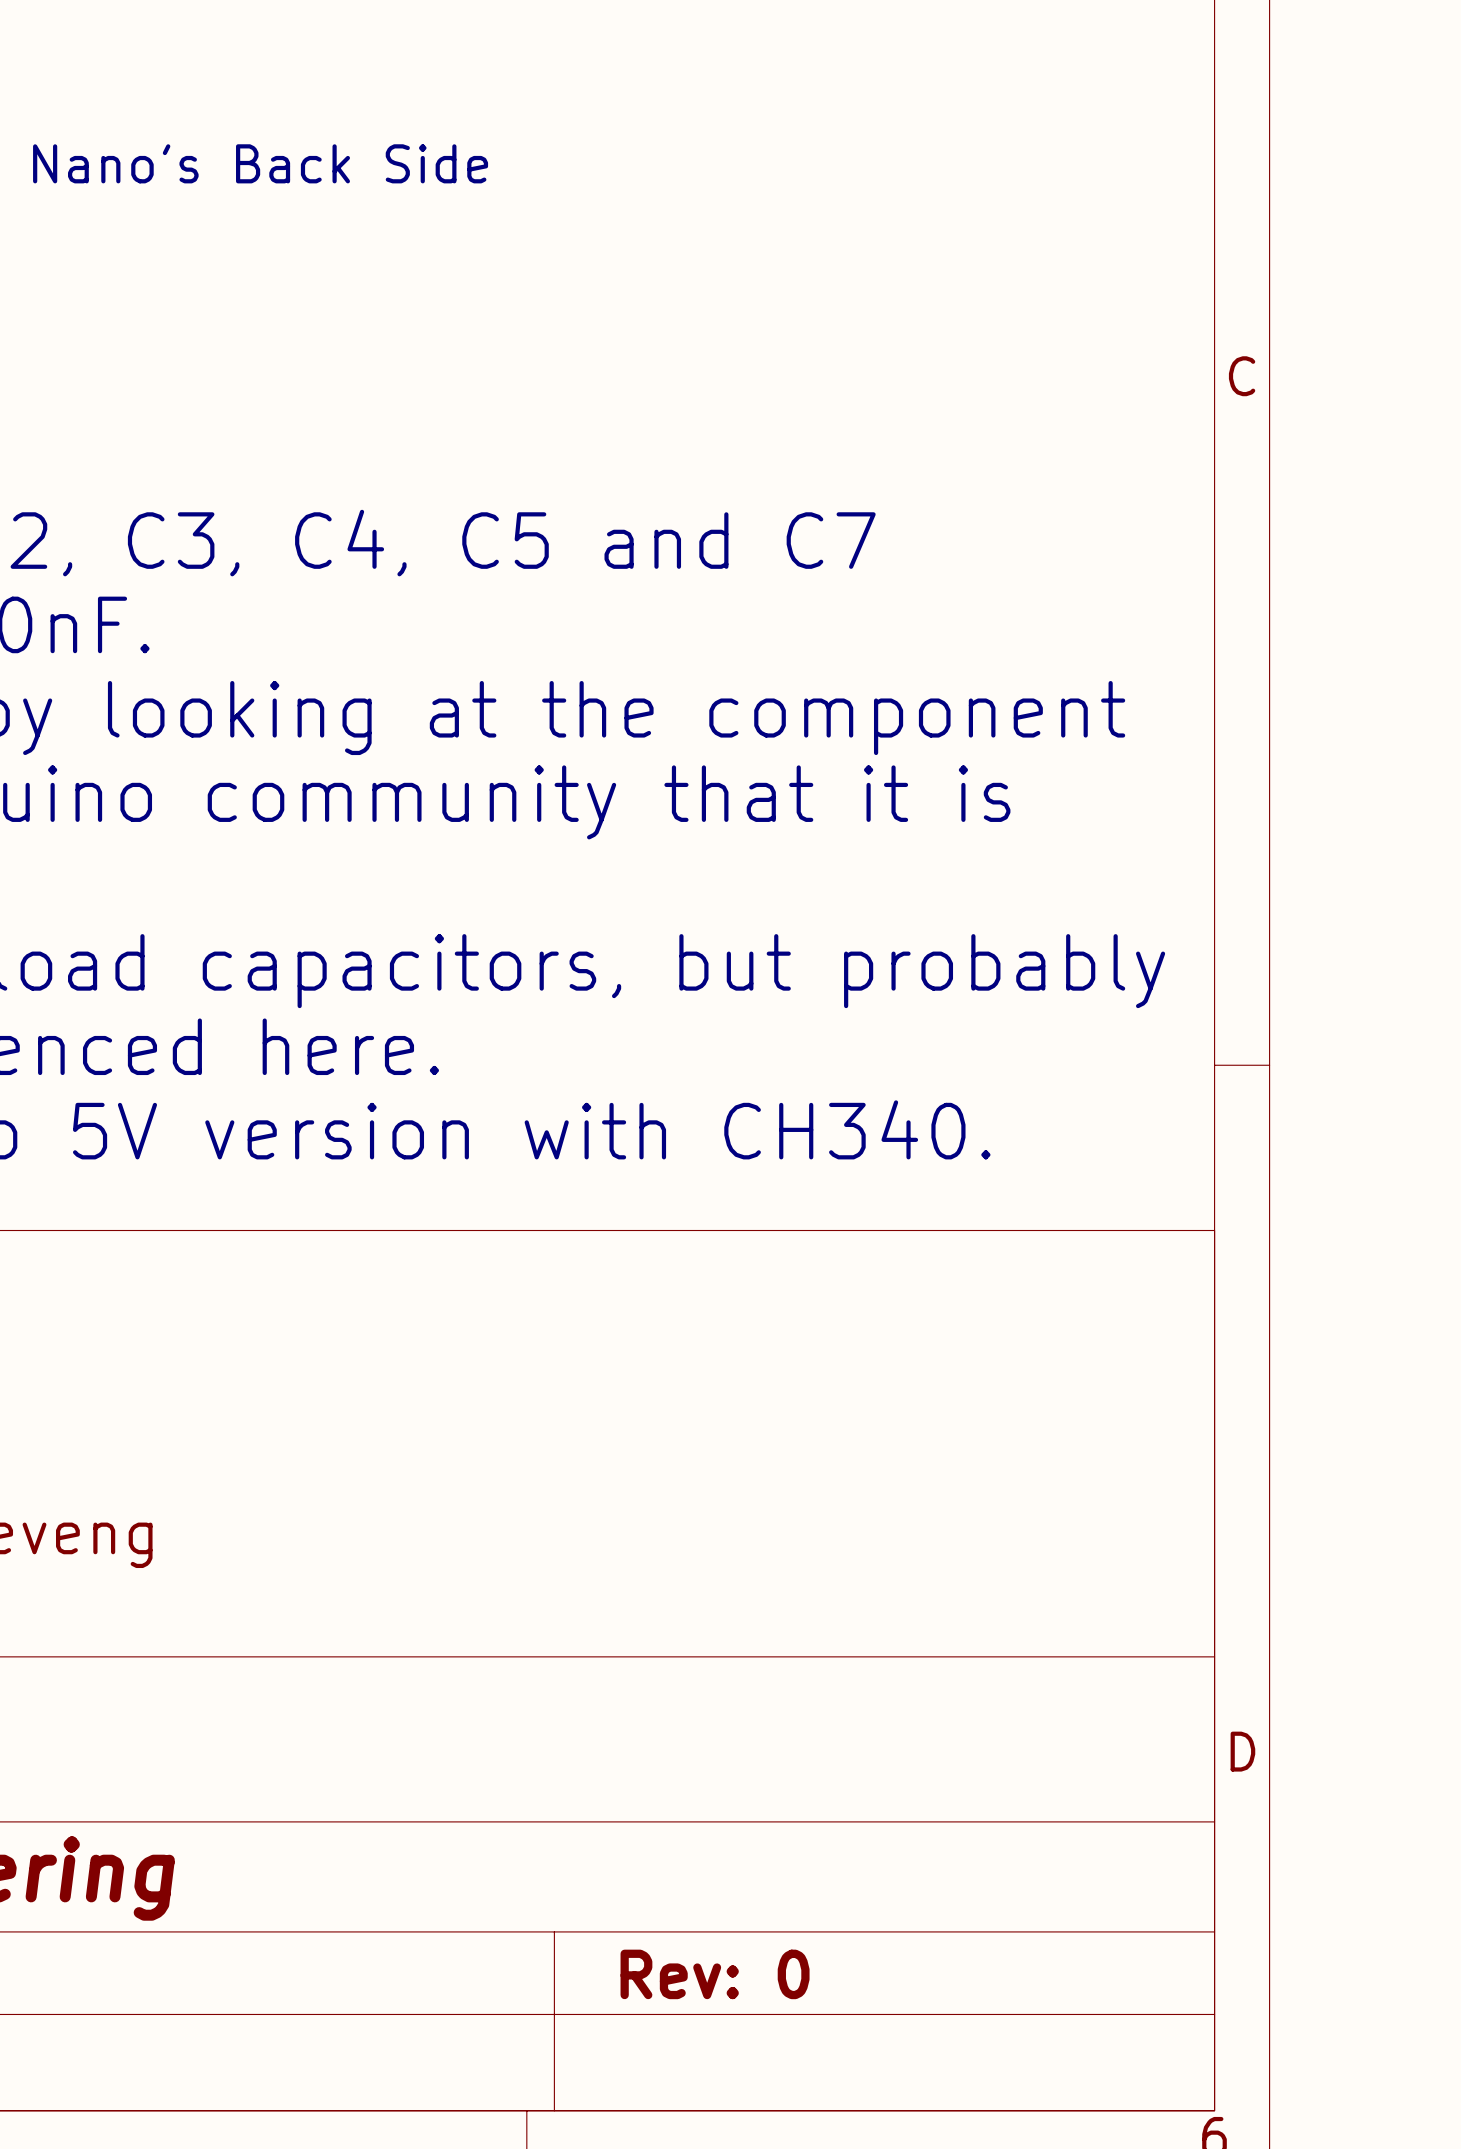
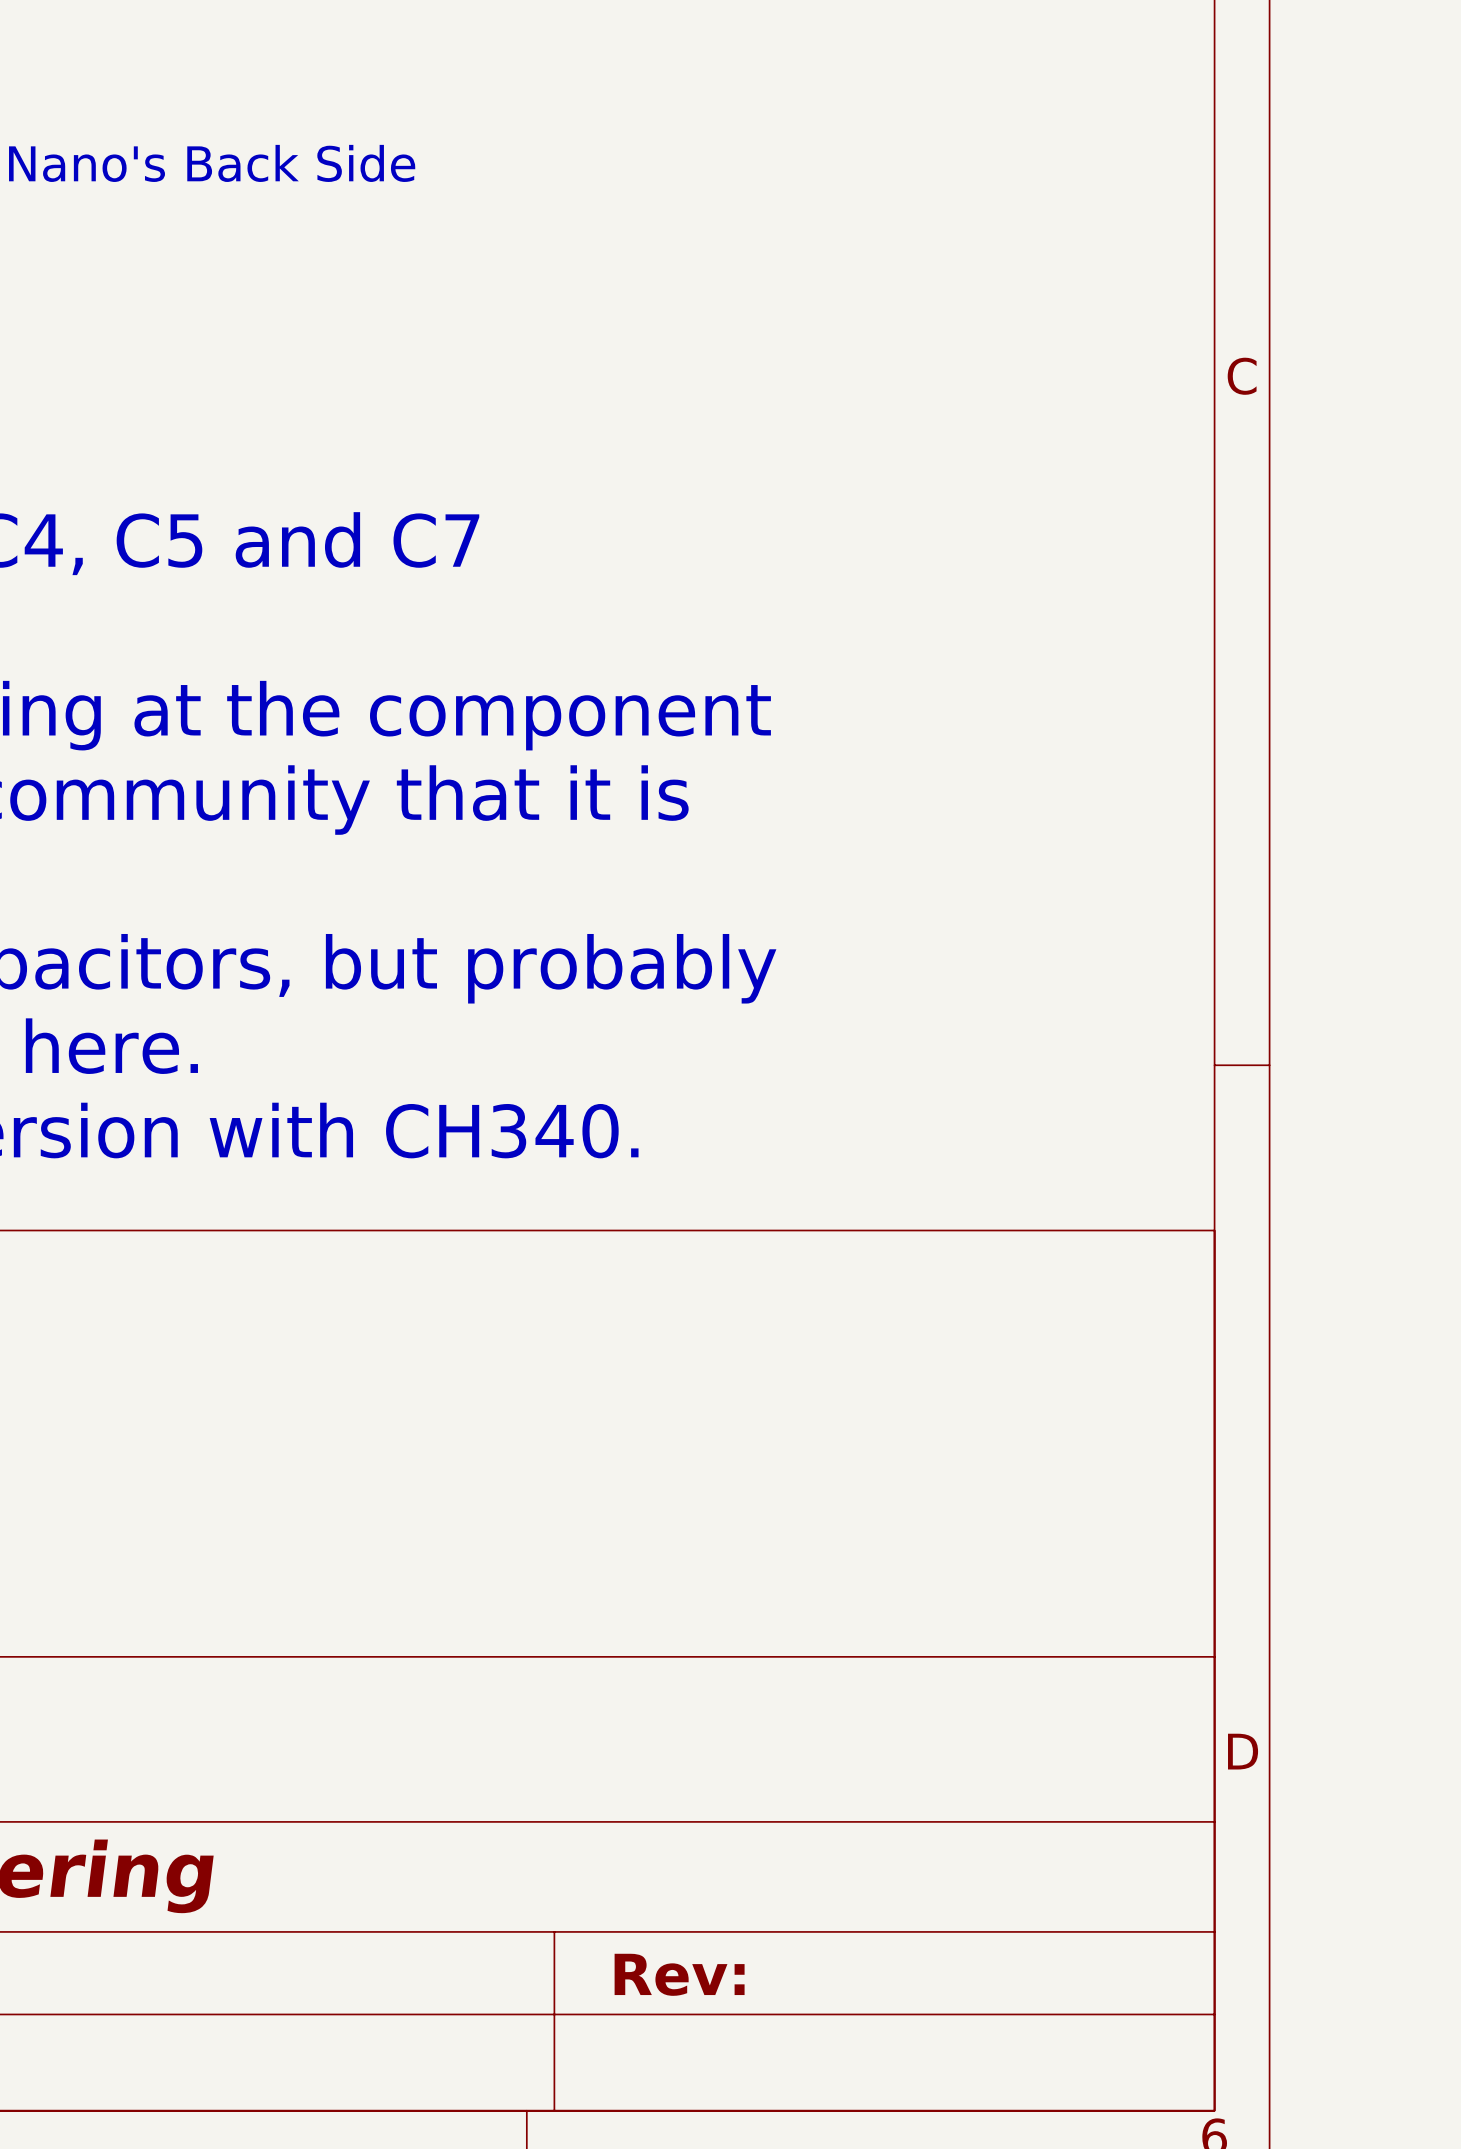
title block: Rev: 0 (715, 1974) -> Rev: (679, 1974)

